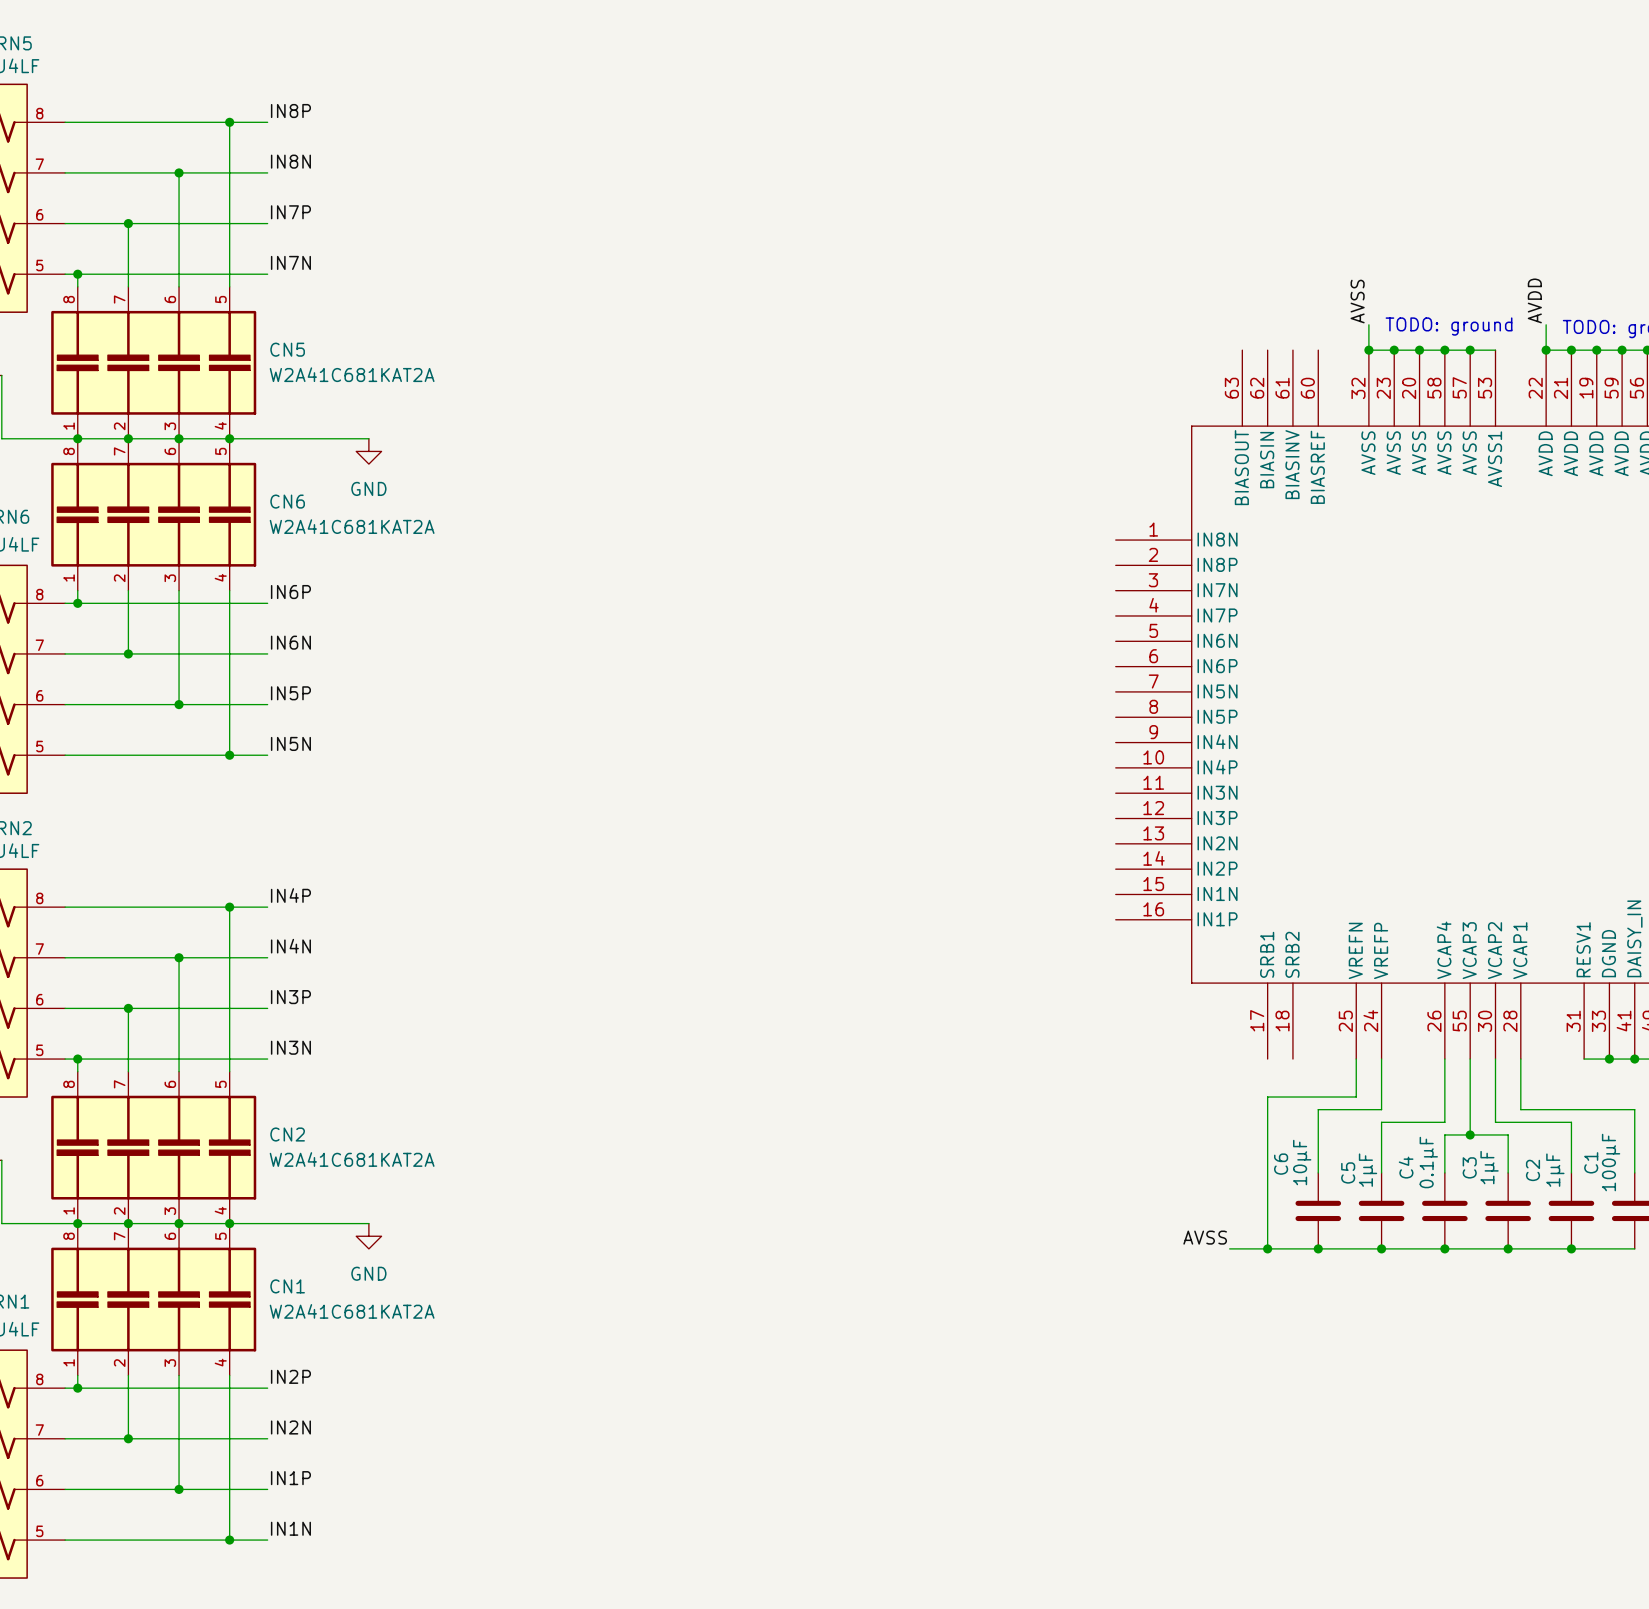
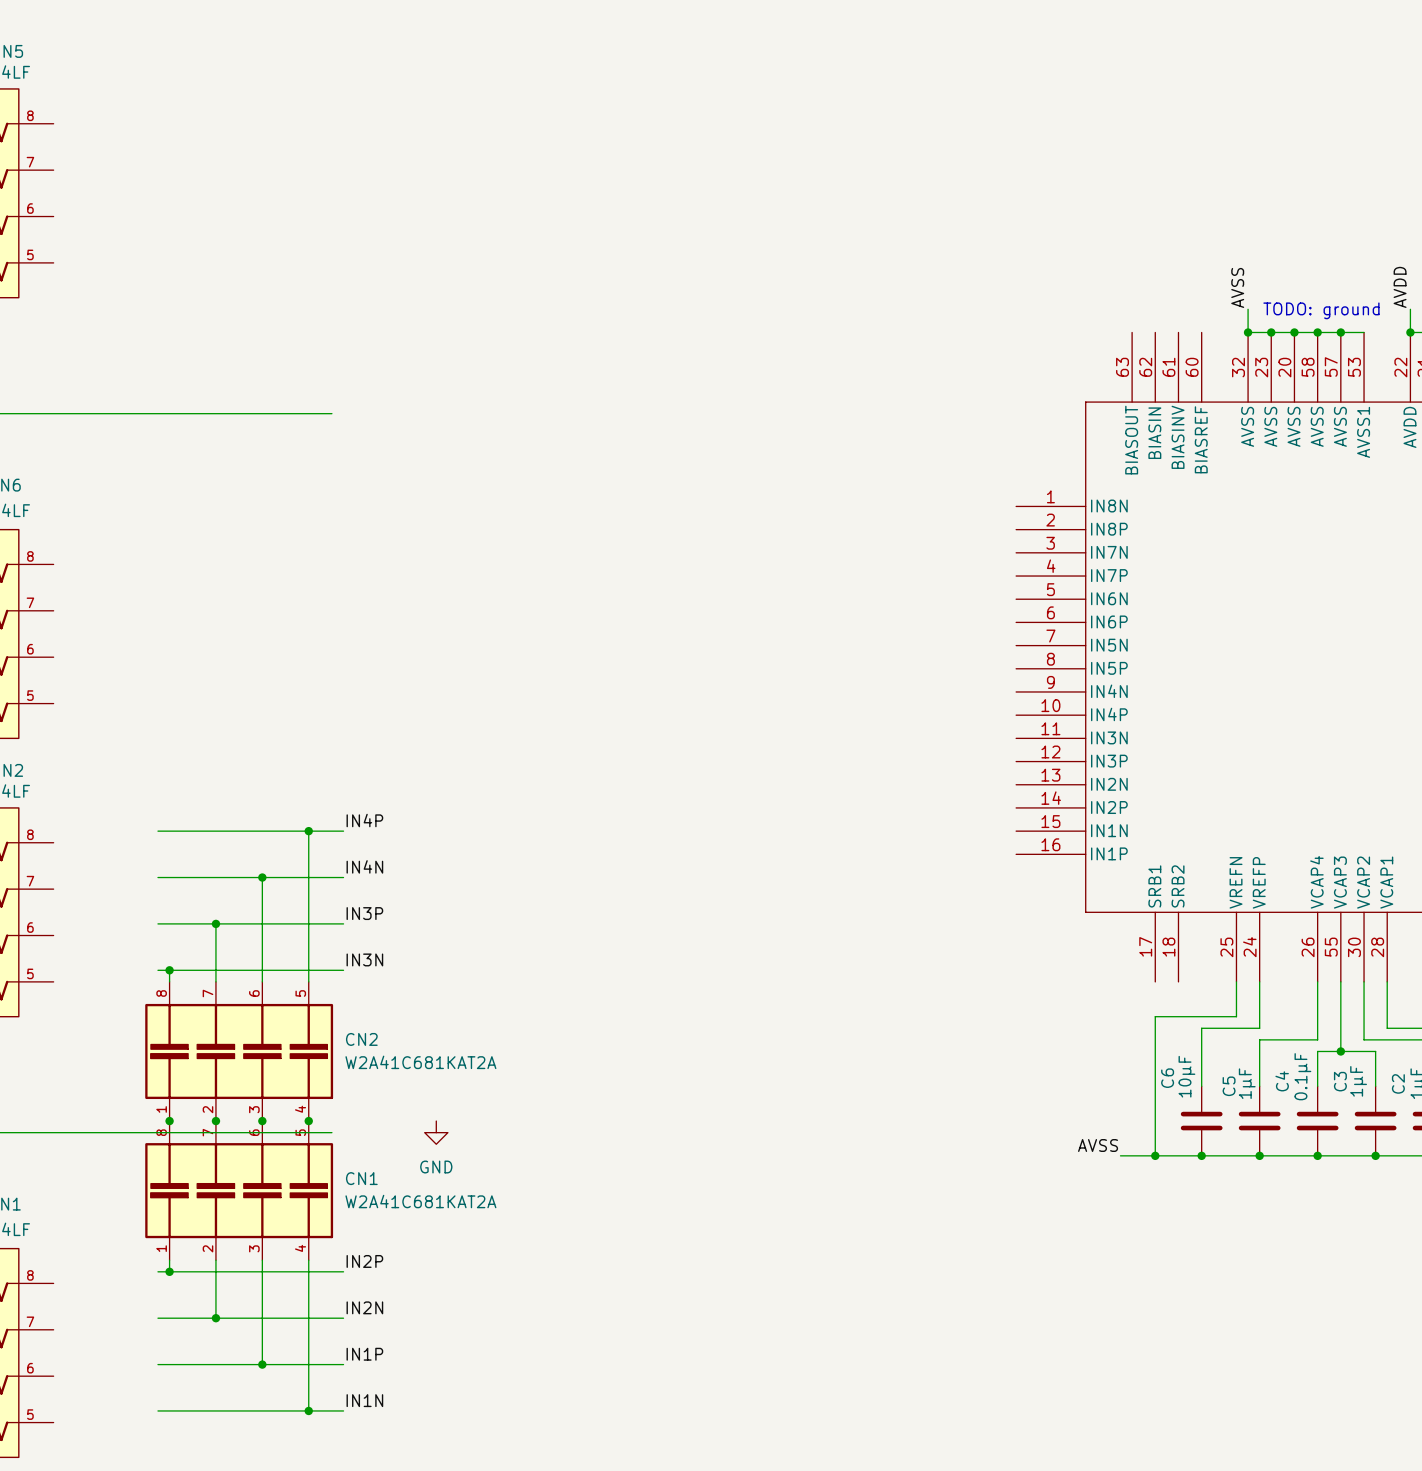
label: IN8P (290, 111) -> none
wire: (65, 122) (267, 122) -> none
wire: (229, 122) (229, 286) -> none
junction: (229, 122) -> none
label: IN8N (290, 161) -> none
wire: (65, 172) (267, 172) -> none
wire: (179, 172) (179, 286) -> none
junction: (179, 172) -> none
label: IN7P (290, 212) -> none
wire: (65, 223) (267, 223) -> none
wire: (128, 223) (128, 286) -> none
junction: (128, 223) -> none
label: IN7N (290, 262) -> none
wire: (65, 274) (267, 274) -> none
wire: (77, 274) (77, 286) -> none
junction: (77, 274) -> none
CN5: W2A41C681KAT2A (153, 362) -> none
junction: (77, 438) -> none
junction: (128, 438) -> none
junction: (179, 438) -> none
junction: (229, 438) -> none
power symbol: GND (368, 451) -> none
CN6: W2A41C681KAT2A (153, 514) -> none
wire: (77, 590) (77, 603) -> none
wire: (128, 590) (128, 653) -> none
wire: (179, 590) (179, 704) -> none
wire: (229, 590) (229, 755) -> none
label: IN6P (290, 592) -> none
wire: (65, 603) (267, 603) -> none
junction: (77, 603) -> none
label: IN6N (290, 642) -> none
wire: (65, 653) (267, 653) -> none
junction: (128, 653) -> none
label: IN5P (290, 693) -> none
wire: (65, 704) (267, 704) -> none
junction: (179, 704) -> none
label: IN5N (290, 743) -> none
wire: (65, 755) (267, 755) -> none
junction: (229, 755) -> none
junction: none -> (308, 831)
label position: IN4P (290, 895) -> IN4P (364, 820)
wire: (65, 907) (267, 907) -> (157, 831) (343, 831)
wire: (229, 907) (229, 1071) -> (308, 831) (308, 981)
junction: (229, 907) -> none
junction: none -> (262, 877)
label position: IN4N (290, 946) -> IN4N (364, 866)
wire: (65, 957) (267, 957) -> (157, 877) (343, 877)
wire: (179, 957) (179, 1071) -> (262, 877) (262, 981)
junction: (179, 957) -> none
junction: none -> (215, 923)
label position: IN3P (290, 997) -> IN3P (364, 913)
wire: (65, 1008) (267, 1008) -> (157, 923) (343, 923)
wire: (128, 1008) (128, 1071) -> (215, 923) (215, 981)
junction: (128, 1008) -> none
junction: none -> (169, 970)
label position: IN3N (290, 1047) -> IN3N (364, 959)
wire: (65, 1059) (267, 1059) -> (157, 970) (343, 970)
wire: (77, 1059) (77, 1071) -> (169, 970) (169, 981)
junction: (77, 1059) -> none
CN2 position: (153, 1147) -> (239, 1051)
junction: none -> (262, 1121)
junction: none -> (308, 1121)
junction: (77, 1223) -> none
junction: (128, 1223) -> none
junction position: (179, 1223) -> (169, 1121)
junction position: (229, 1223) -> (215, 1121)
power symbol position: GND (368, 1236) -> GND (436, 1132)
CN1 position: (153, 1299) -> (239, 1190)
wire: none -> (262, 1260) (262, 1364)
wire: (77, 1375) (77, 1388) -> (169, 1260) (169, 1271)
wire: (128, 1375) (128, 1438) -> (215, 1260) (215, 1318)
wire: (179, 1375) (179, 1489) -> (157, 1271) (343, 1271)
junction: none -> (169, 1271)
wire: (229, 1375) (229, 1540) -> (308, 1260) (308, 1410)
label position: IN2P (290, 1376) -> IN2P (364, 1261)
wire: (65, 1388) (267, 1388) -> none
junction: (77, 1388) -> none
junction: none -> (215, 1318)
label position: IN2N (290, 1427) -> IN2N (364, 1307)
wire: (65, 1438) (267, 1438) -> (157, 1318) (343, 1318)
junction: (128, 1438) -> none
junction: none -> (262, 1364)
label position: IN1P (290, 1478) -> IN1P (364, 1354)
wire: (65, 1489) (267, 1489) -> (157, 1364) (343, 1364)
junction: (179, 1489) -> none
junction: none -> (308, 1410)
label position: IN1N (290, 1528) -> IN1N (364, 1400)
wire: (65, 1540) (267, 1540) -> (157, 1410) (343, 1410)
junction: (229, 1540) -> none

